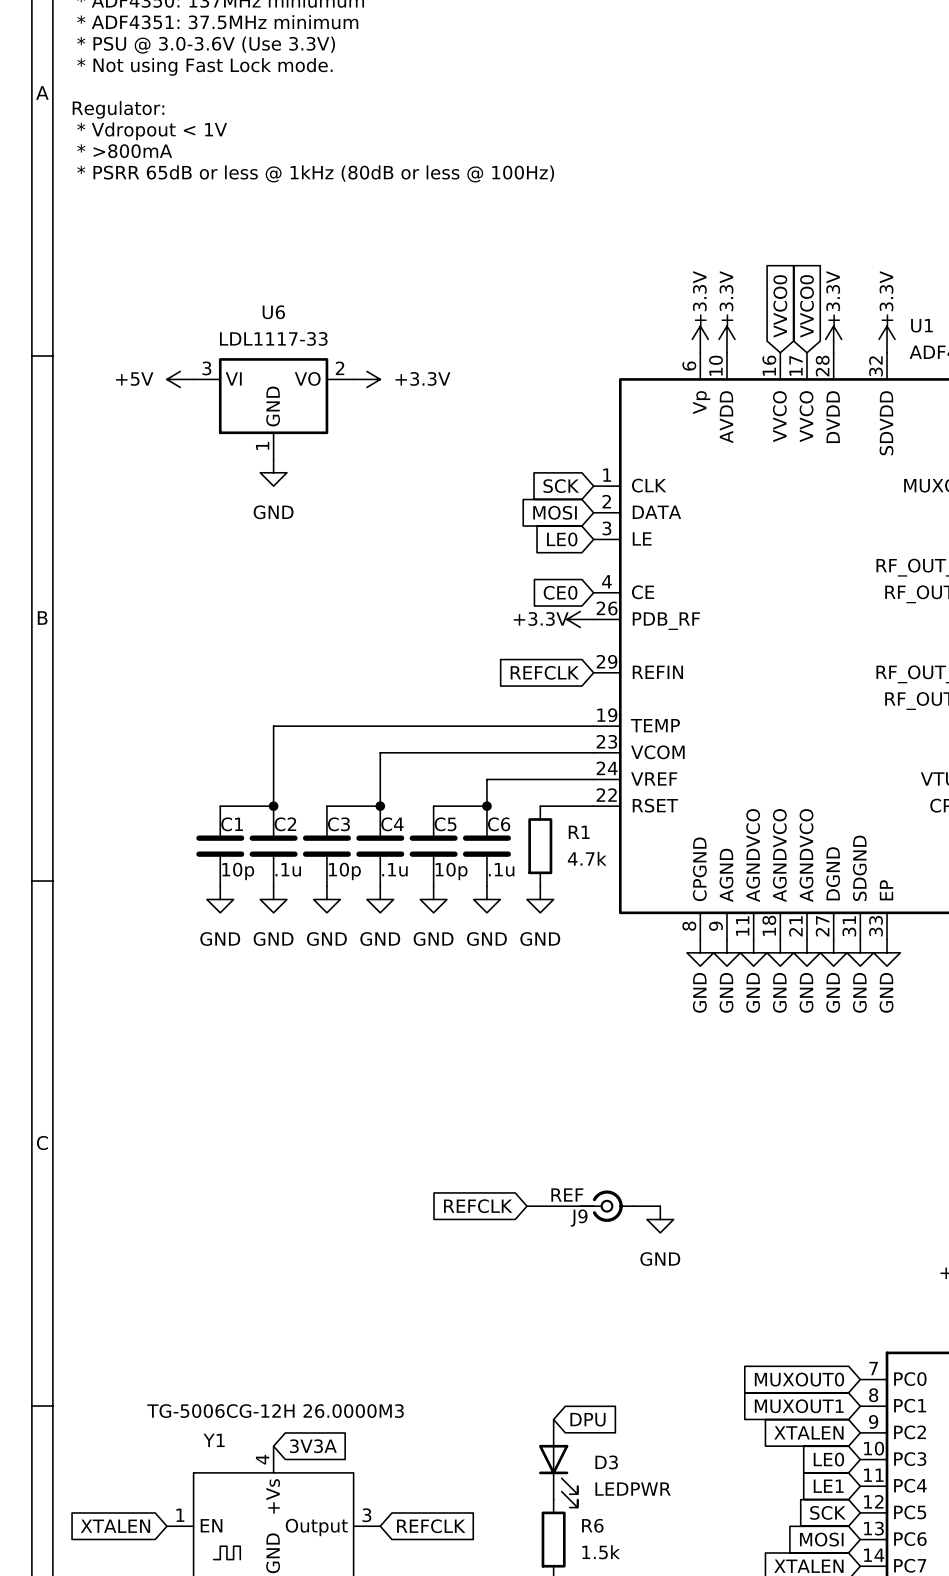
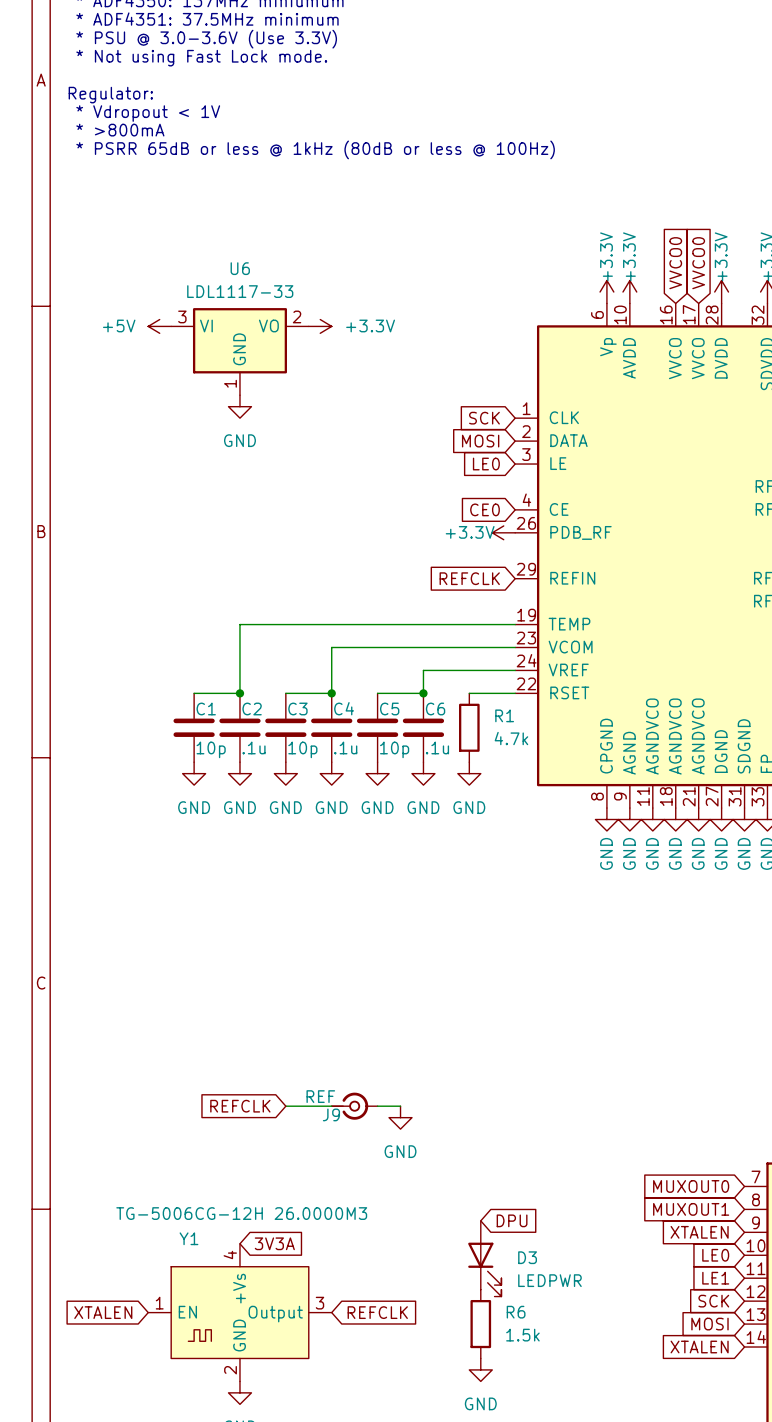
global label position: REFCLK (478, 1206) -> REFCLK (240, 1106)
wire: (526, 1206) (580, 1206) -> (285, 1106) (331, 1106)
J9 position: (606, 1206) -> (354, 1106)
wire: (633, 1206) (660, 1206) -> (377, 1106) (400, 1106)
power symbol position: GND (660, 1219) -> GND (400, 1117)

